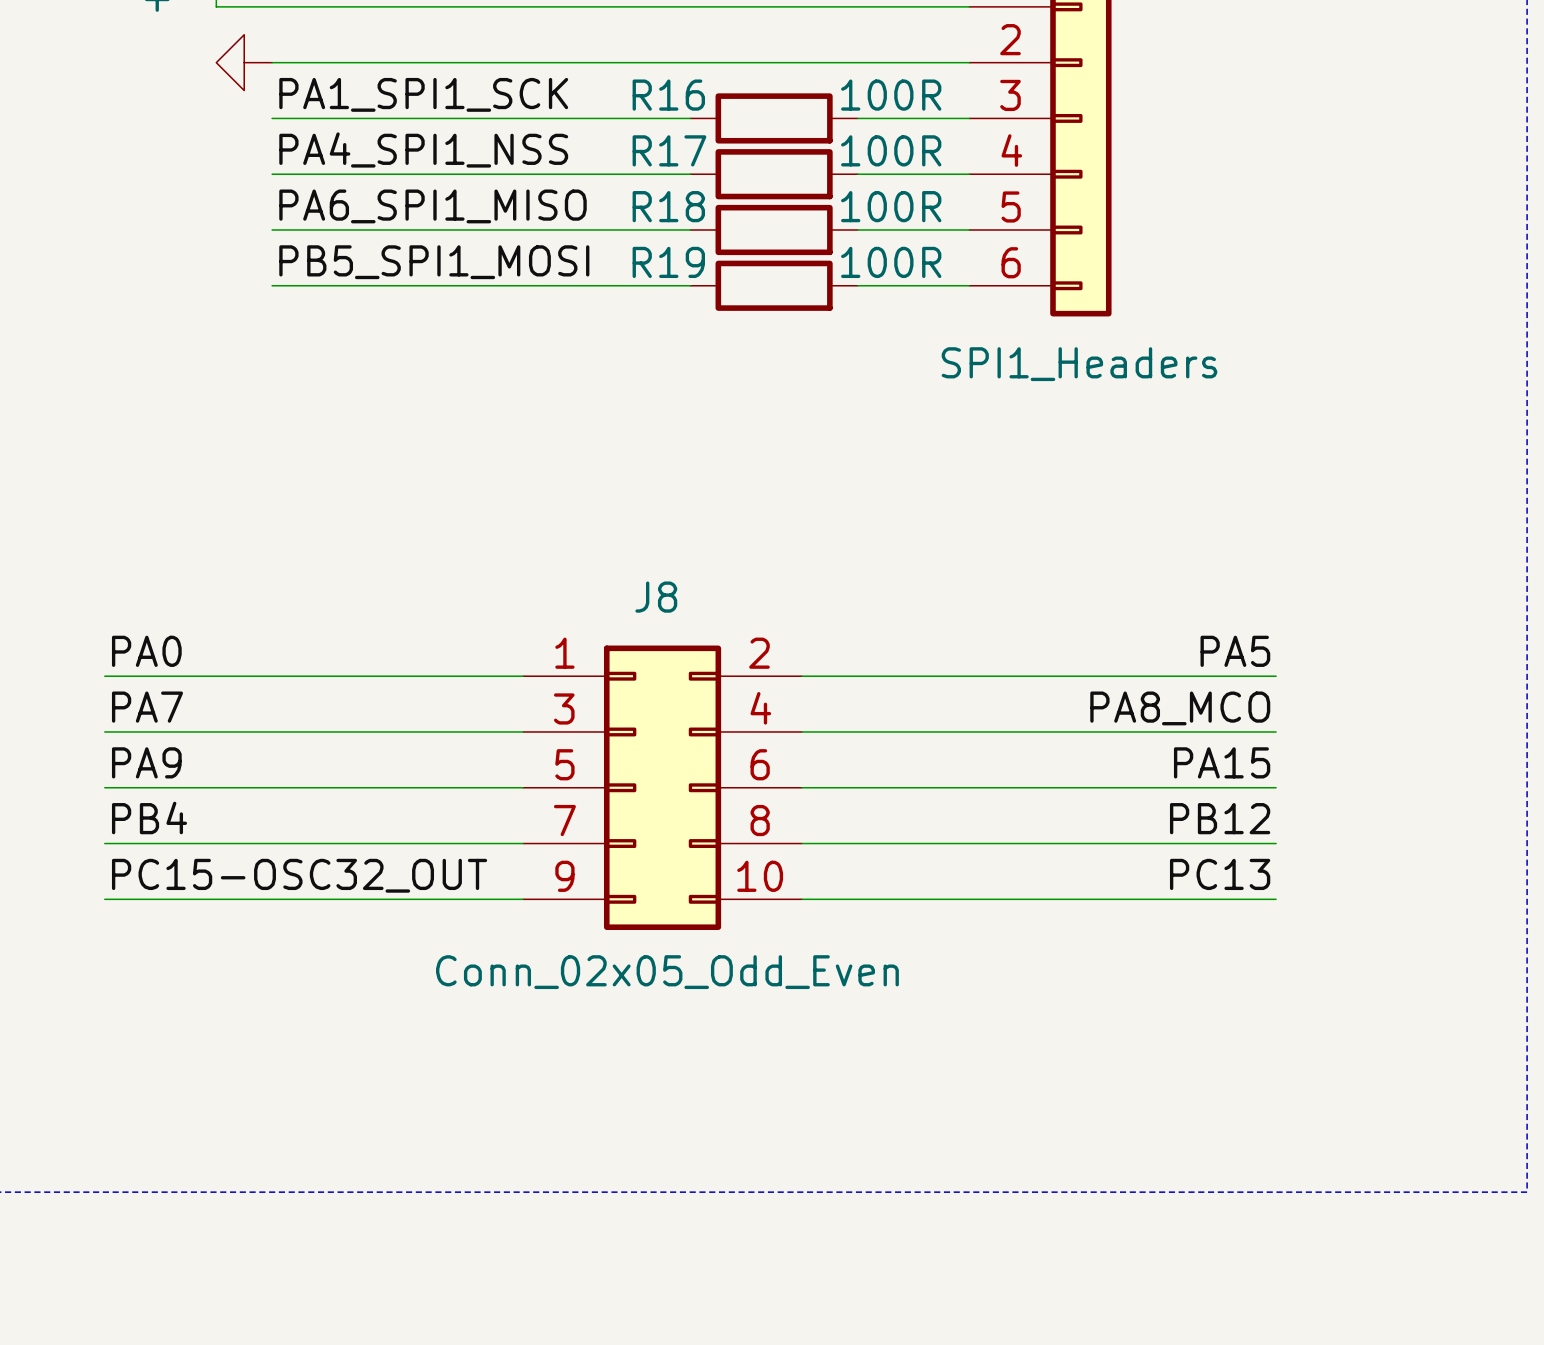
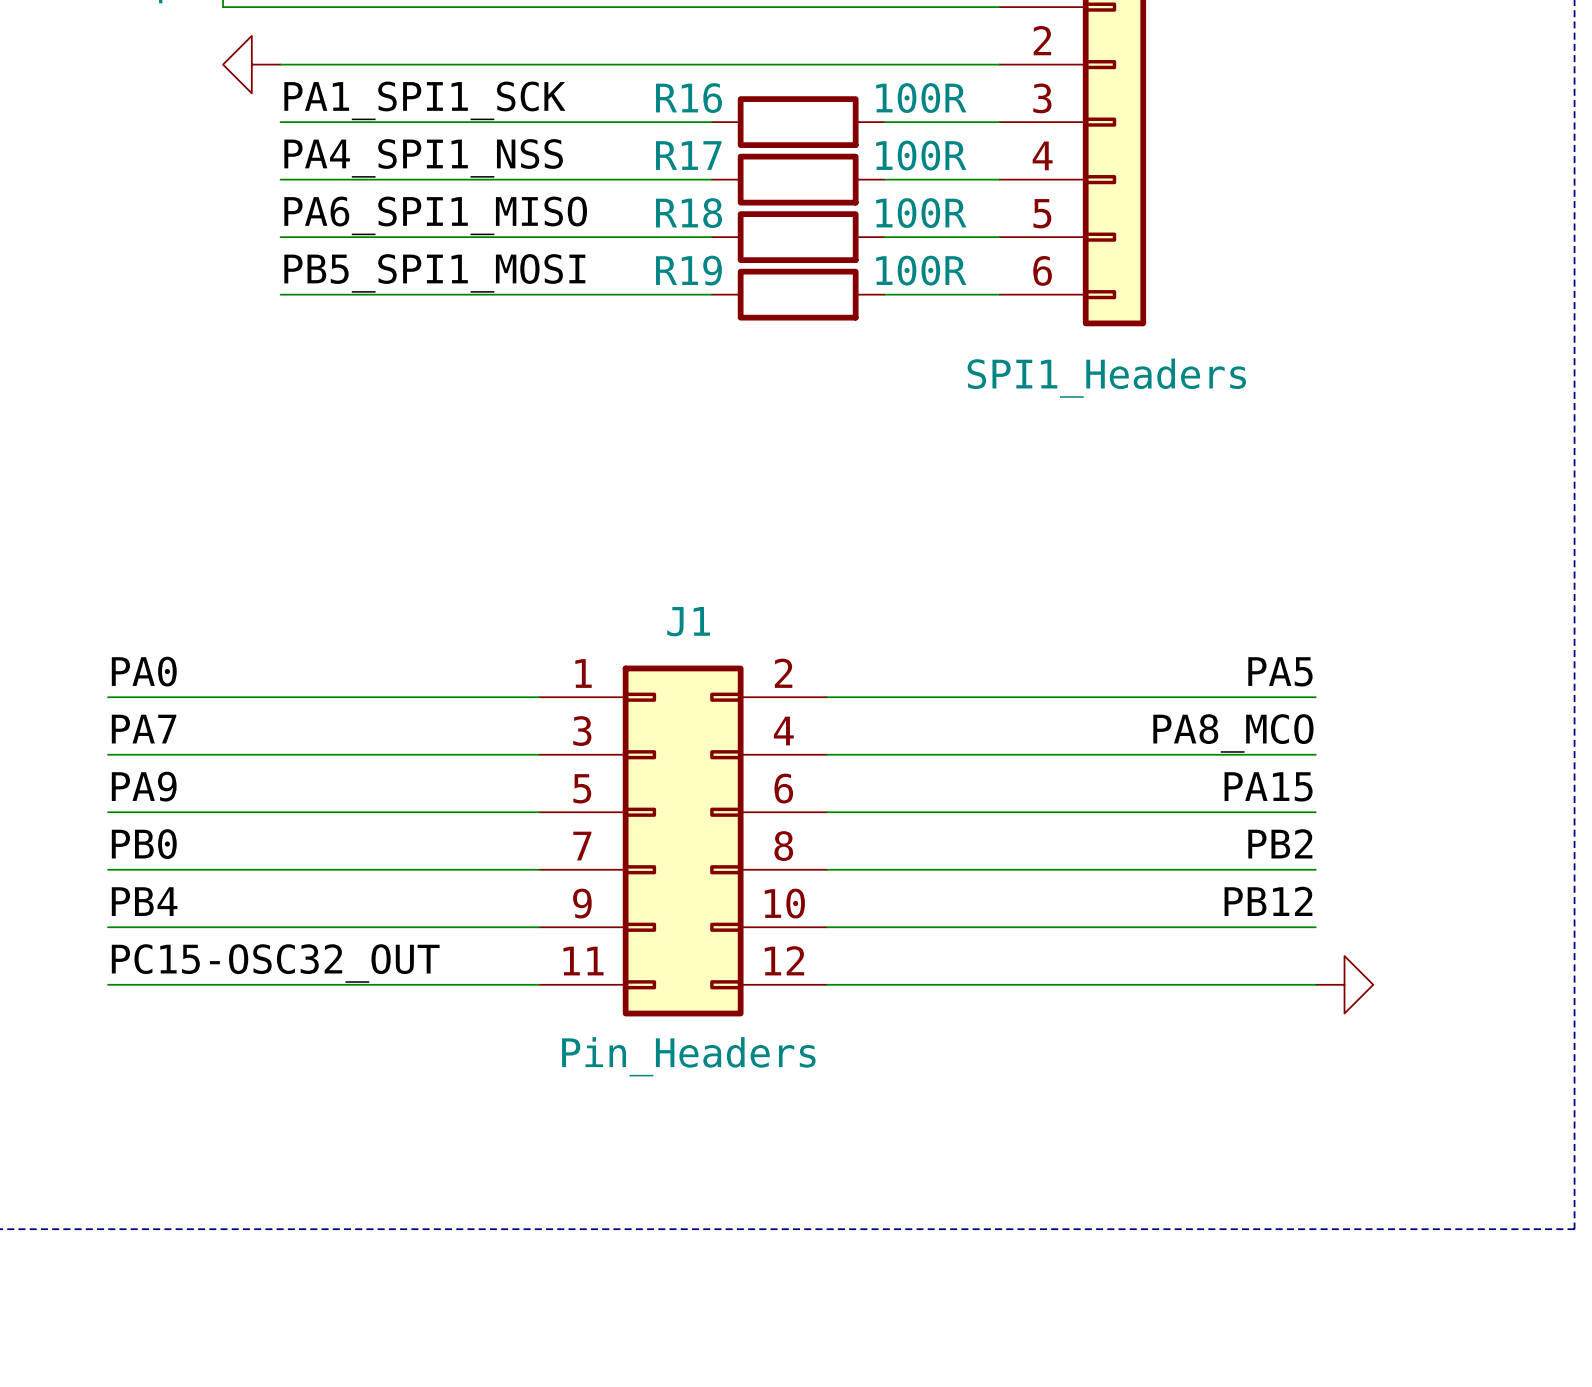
J8: Conn_02x05_Odd_Even (662, 787) -> none
J1: none -> Pin_Headers (683, 841)
label: PB4 (149, 817) -> PB0 (144, 844)
label: PB12 (1220, 818) -> PB2 (1280, 843)
label: PC13 (1220, 874) -> PB12 (1268, 901)
label: PC15-OSC32_OUT (299, 875) -> PB4 (144, 901)
label: none -> PC15-OSC32_OUT (275, 963)
wire: none -> (108, 984) (539, 984)
wire: none -> (826, 984) (1315, 984)
power symbol: none -> (1344, 984)

